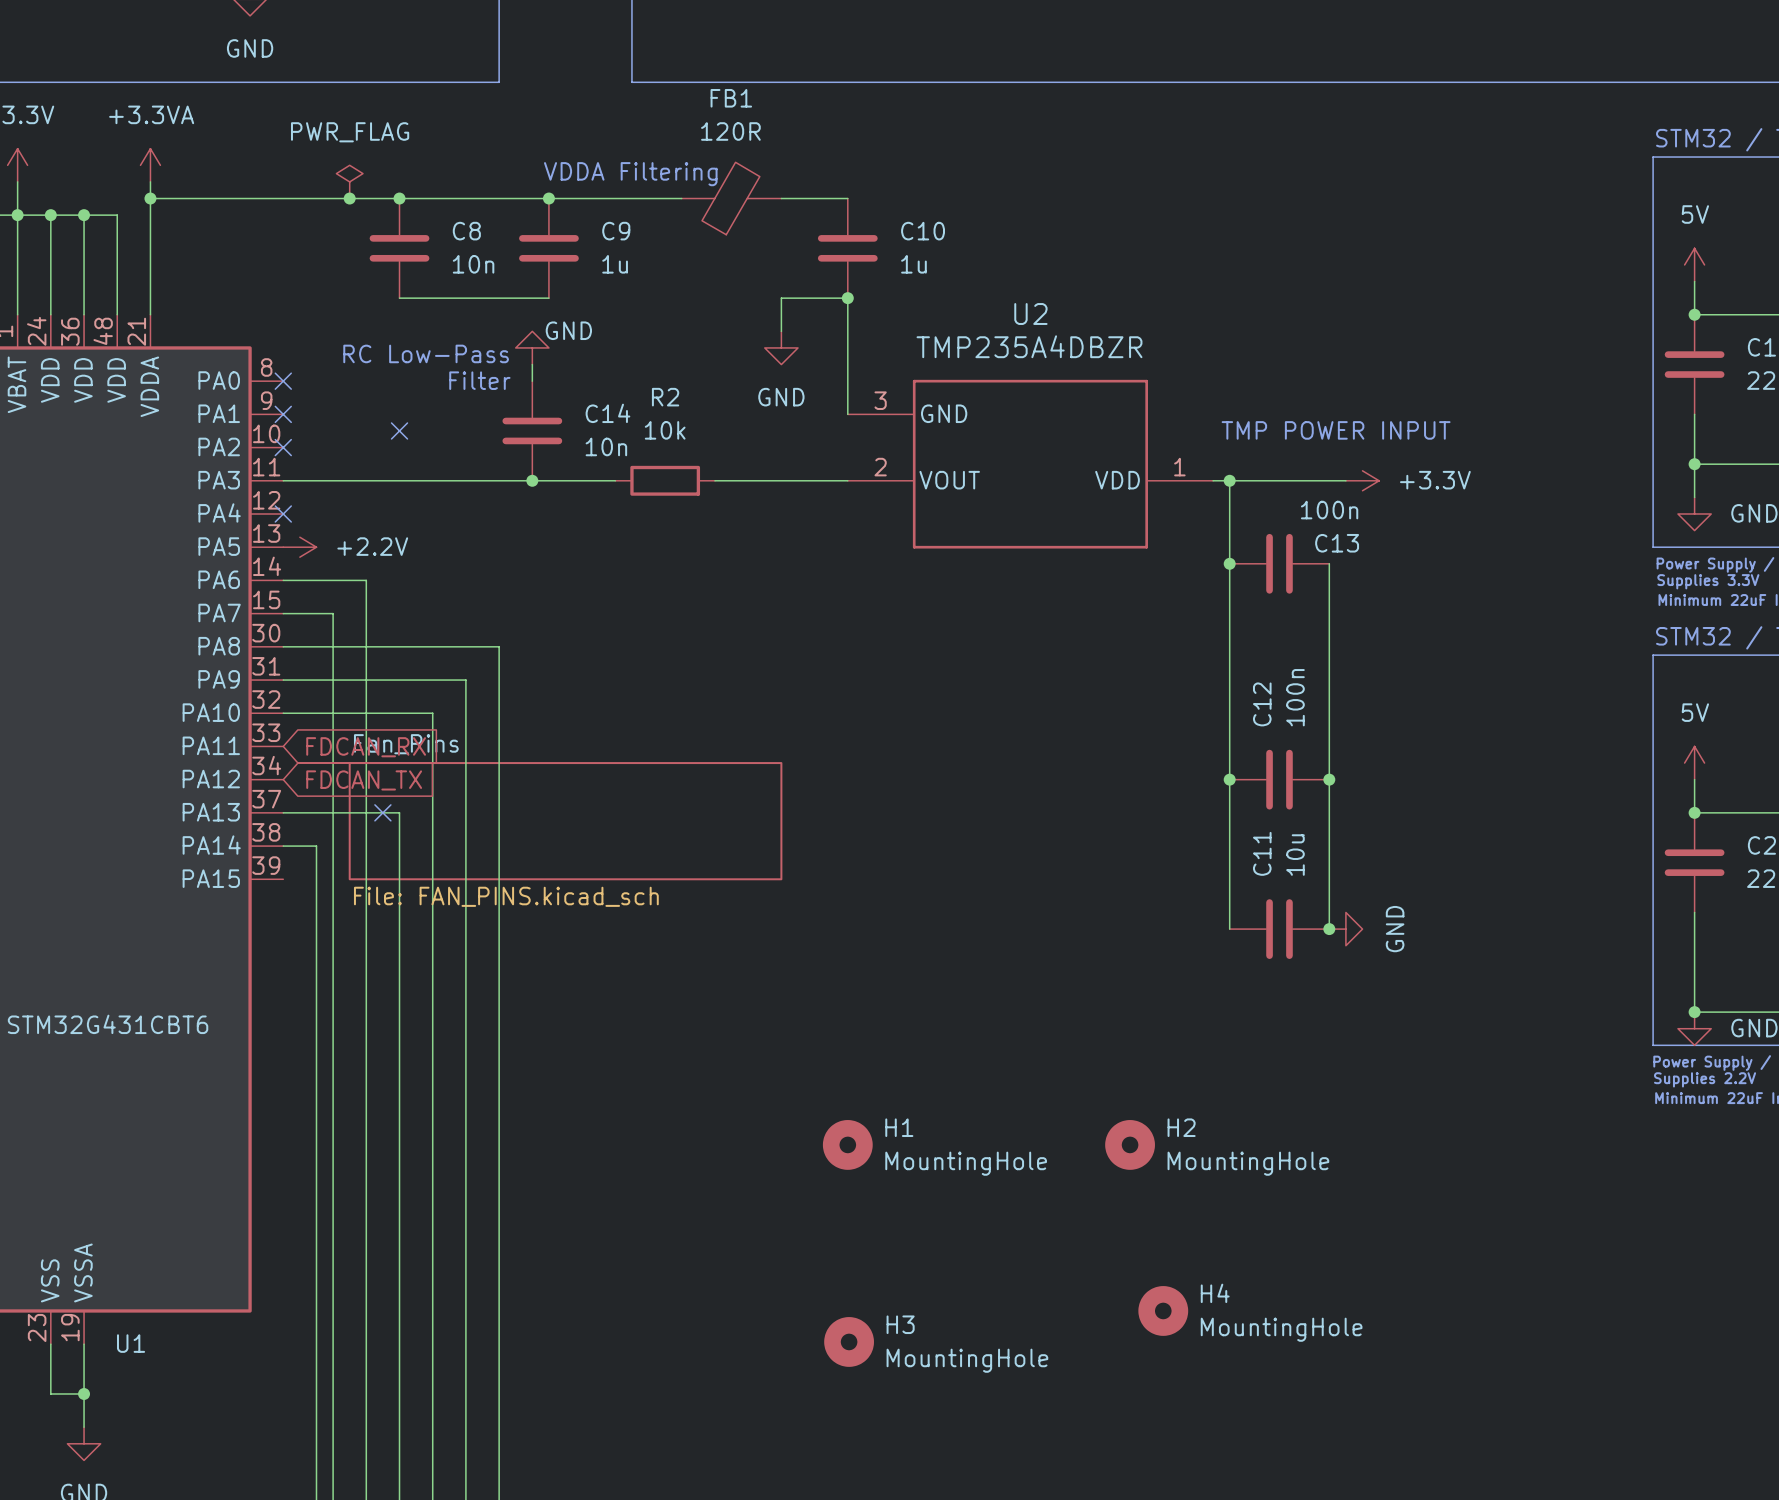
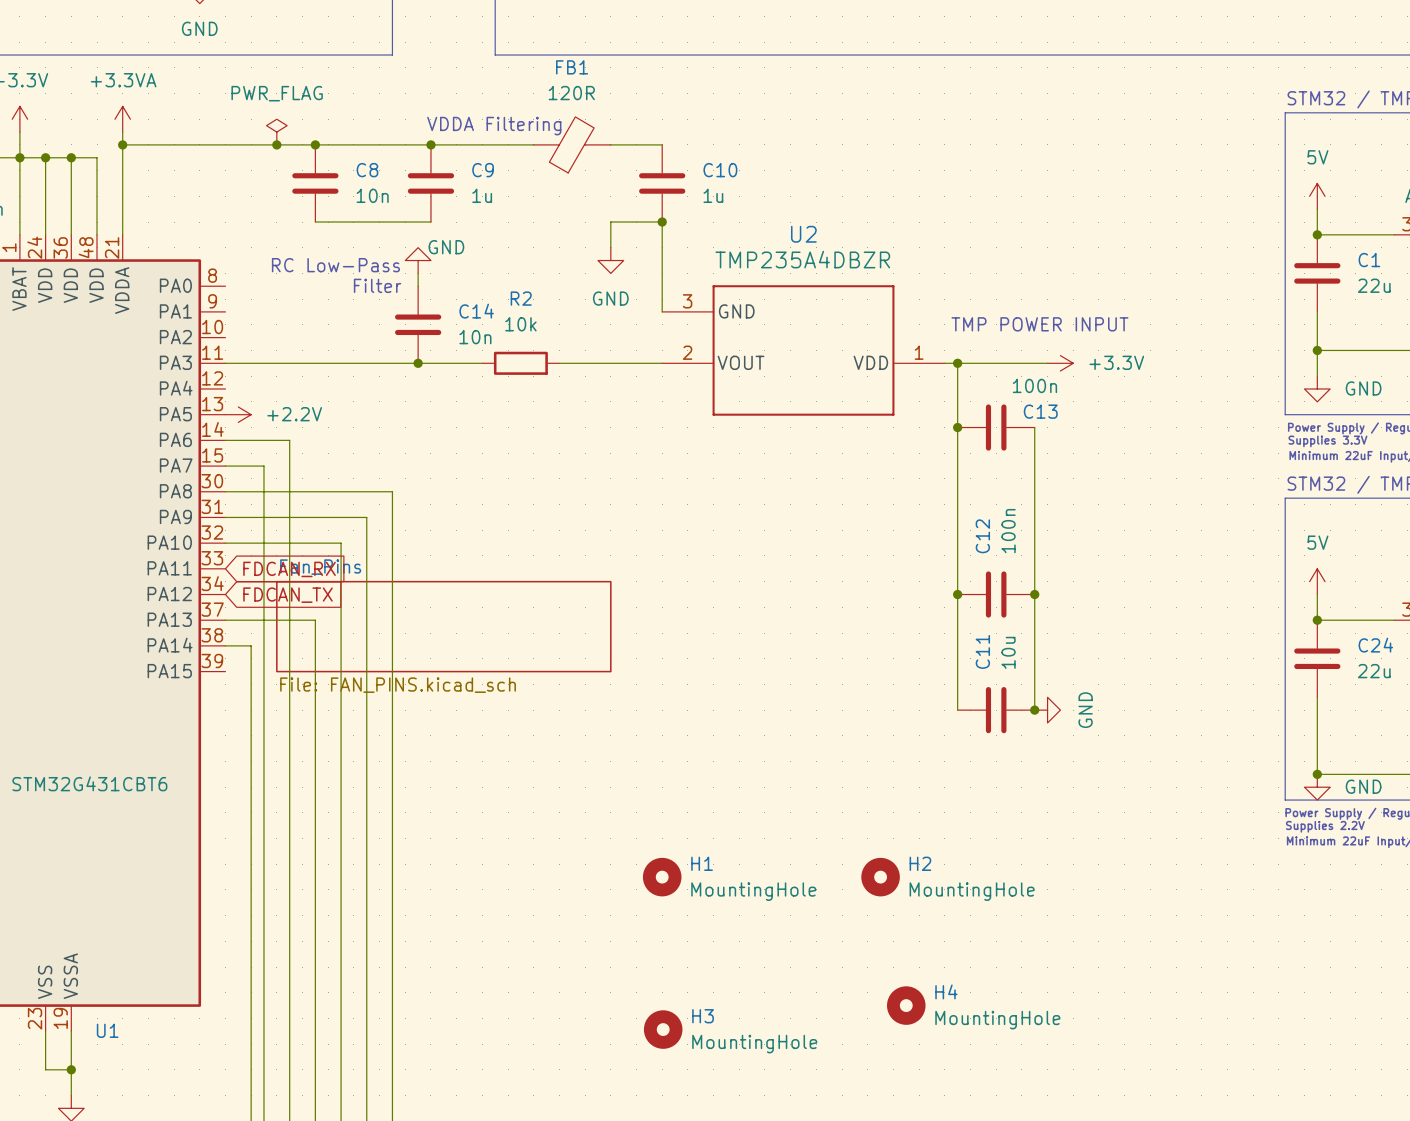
no-connect mark: (283, 381) -> none
no-connect mark: (283, 414) -> none
no-connect mark: (399, 430) -> none
no-connect mark: (283, 447) -> none
no-connect mark: (283, 513) -> none
no-connect mark: (382, 812) -> none

